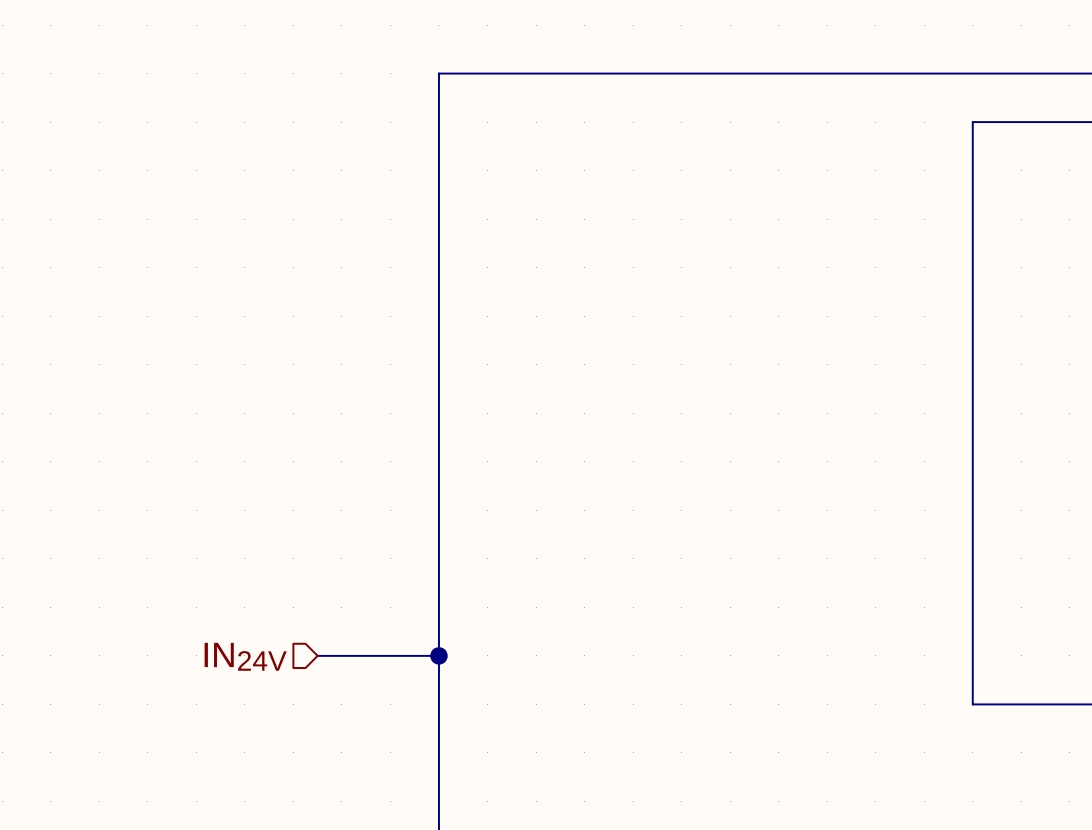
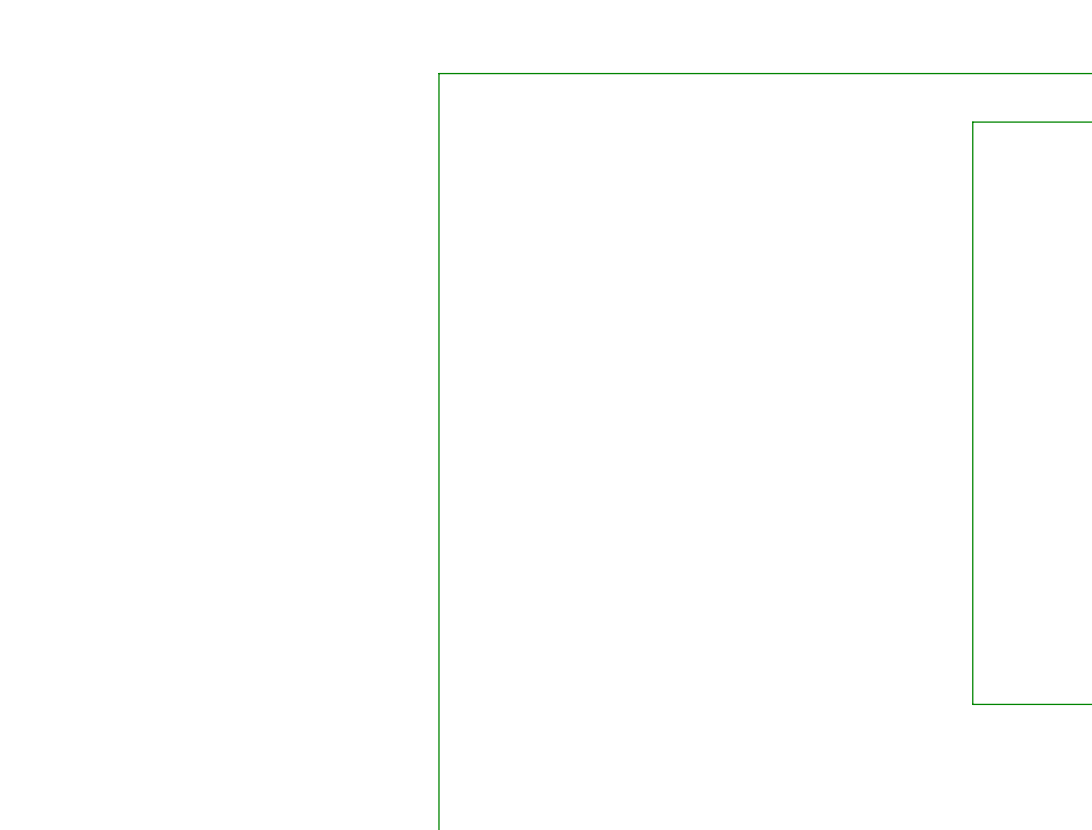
wire: (317, 655) (438, 655) -> none
junction: (438, 655) -> none
hierarchical label: IN24V (245, 656) -> none

